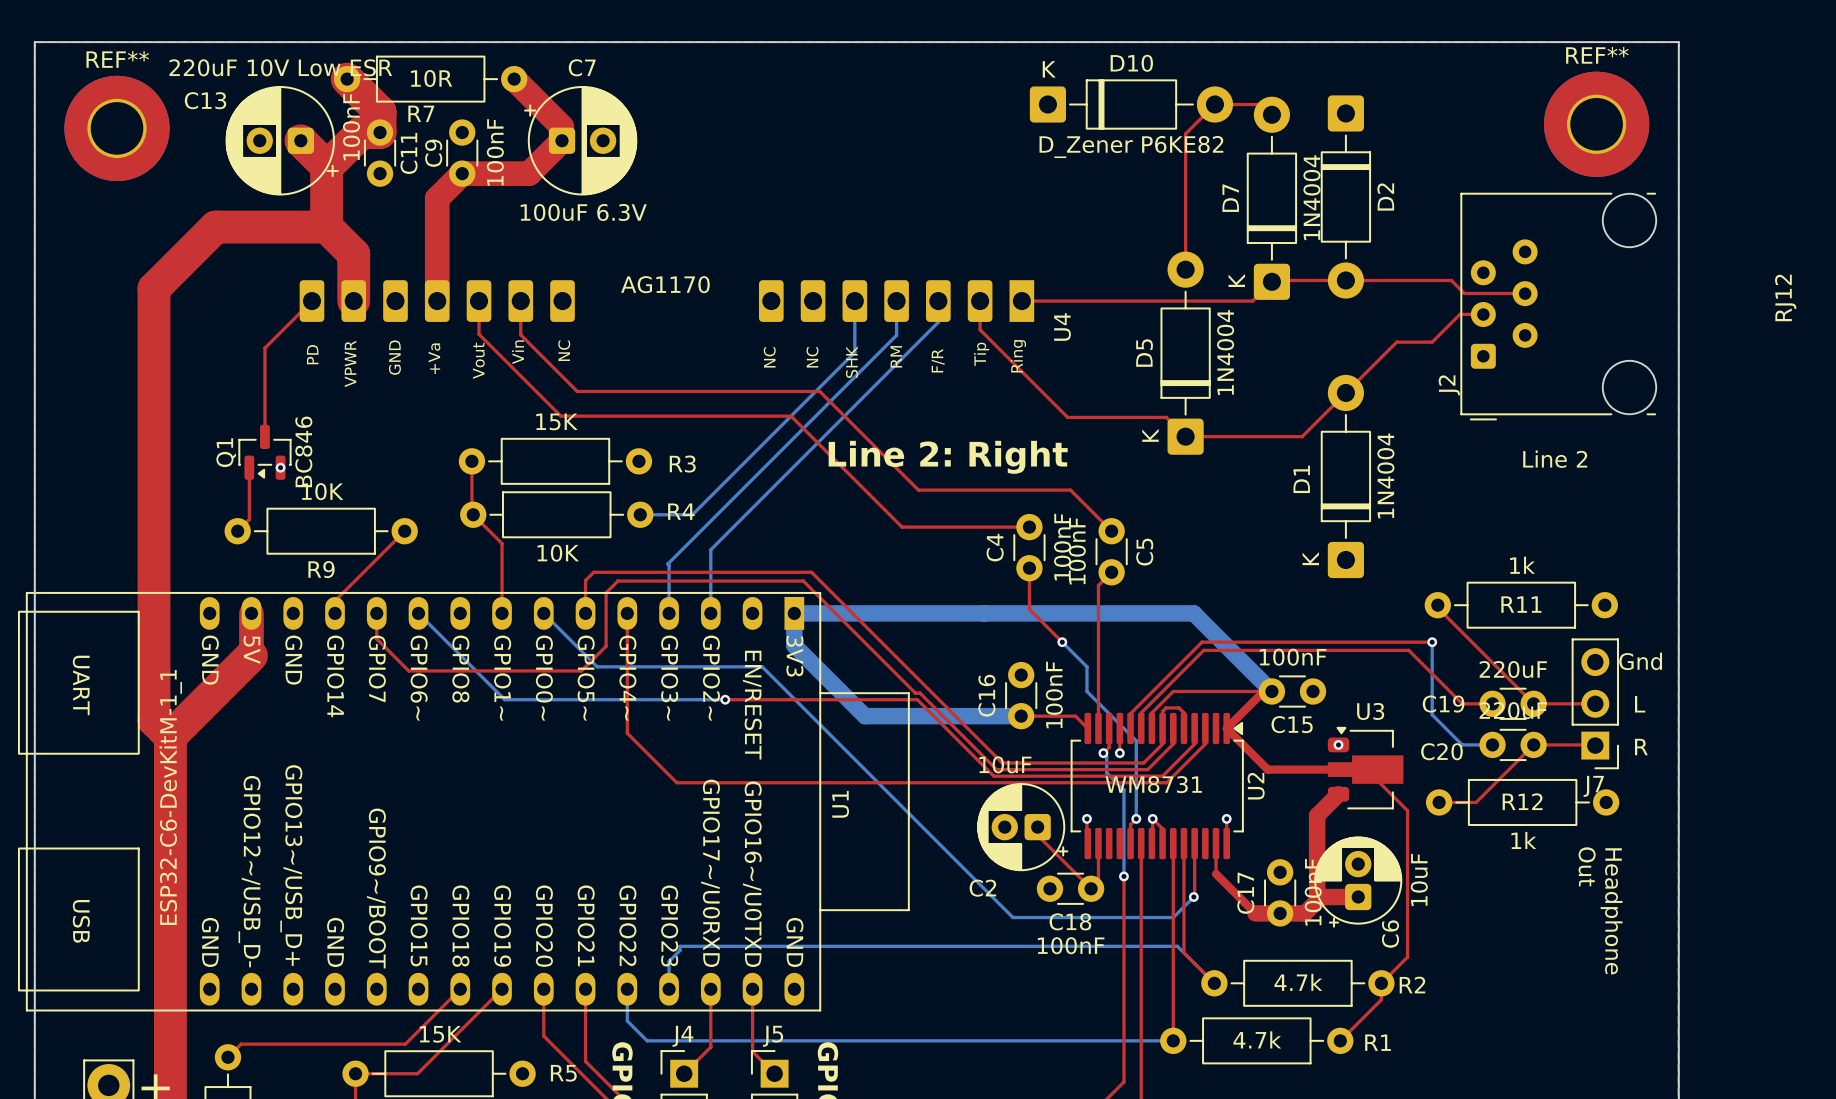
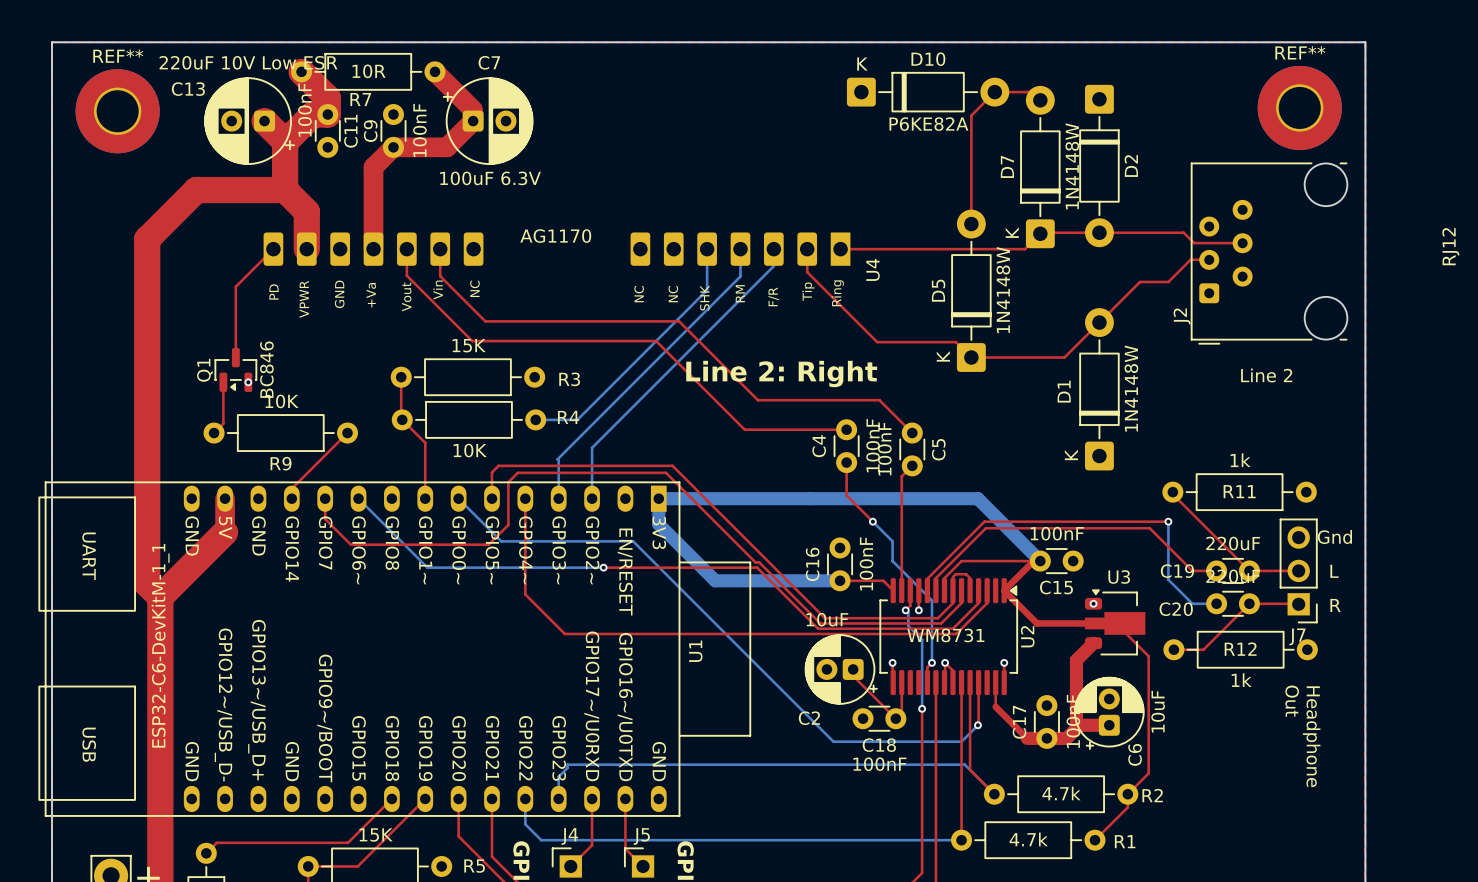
D10 value: D_Zener P6KE82 (1131, 147) -> P6KE82A (928, 124)
D7 value: 1N4004 (1311, 197) -> 1N4148W (1072, 166)
D5 value: 1N4004 (1225, 352) -> 1N4148W (1003, 290)
D1 value: 1N4004 (1385, 475) -> 1N4148W (1131, 388)

